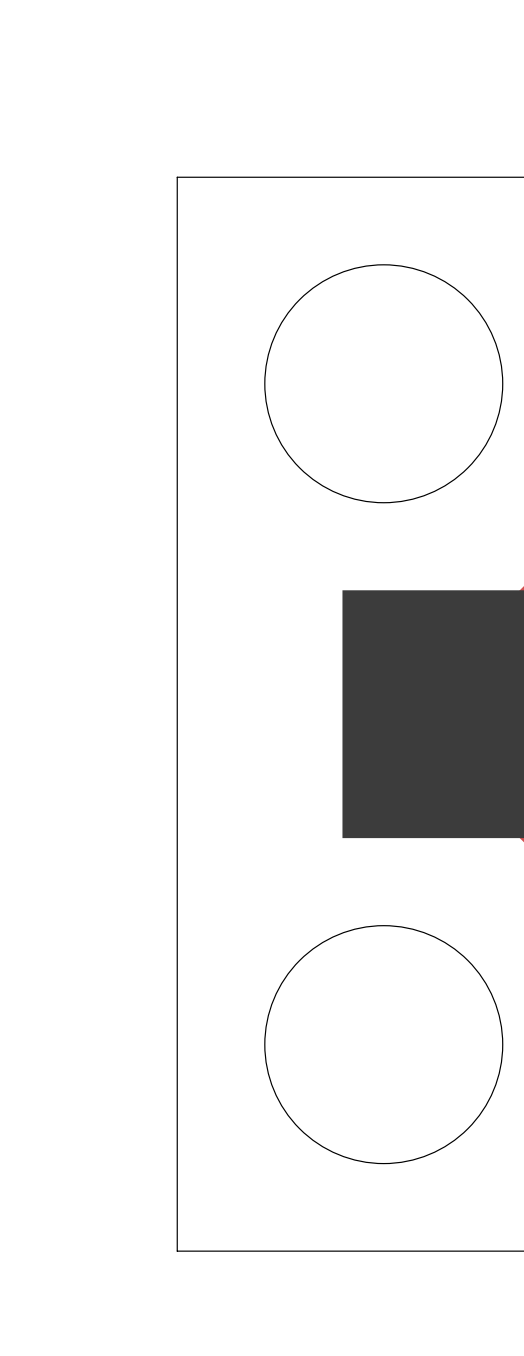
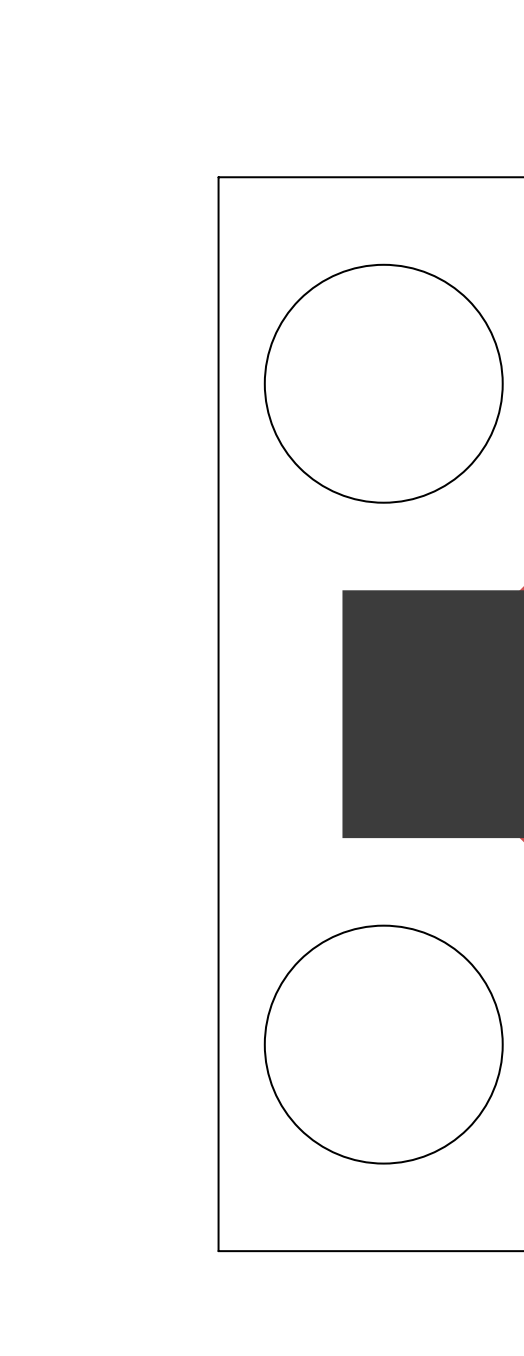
board edge: (218, 177) (177, 177) (177, 1251) (218, 1251) -> (218, 177) (218, 1251)

